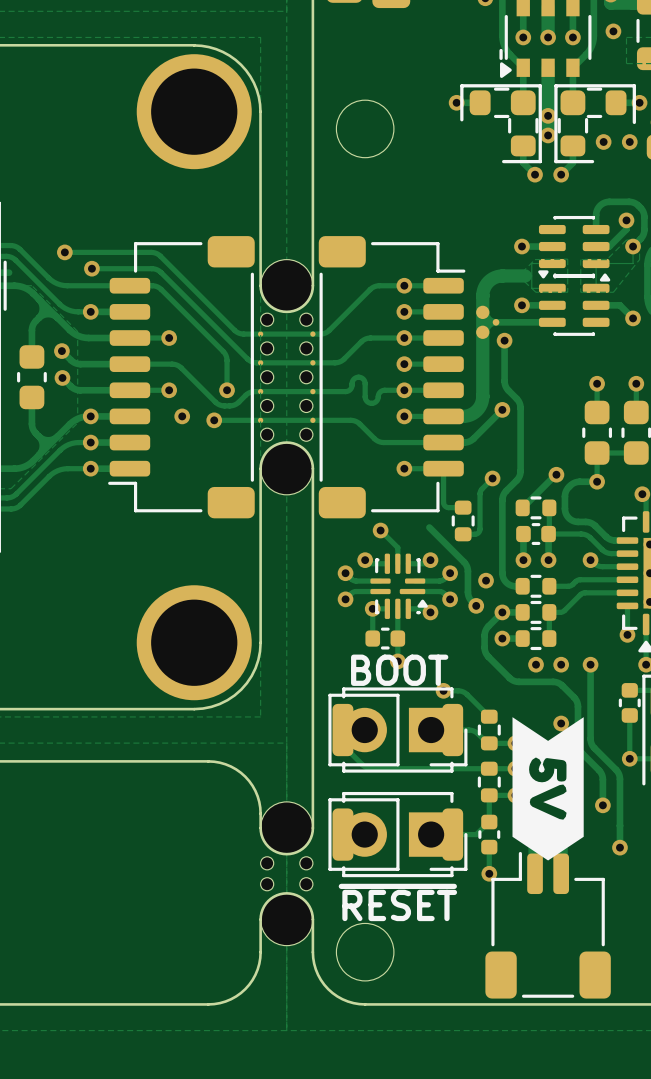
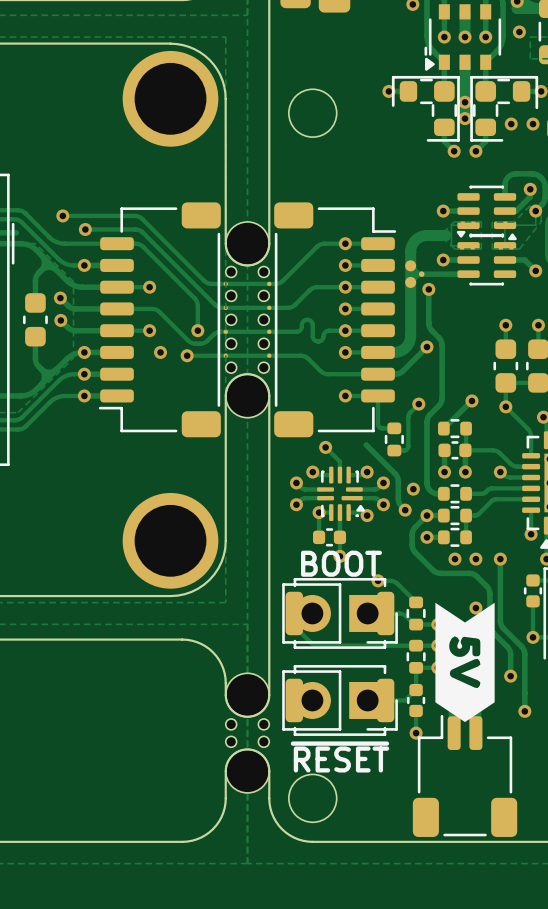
track: (597, 481) (577, 482) (567, 488) (564, 496) (566, 515) (574, 521) (592, 523) (610, 539) (627, 540) -> (505, 406) (529, 431) (531, 455)

